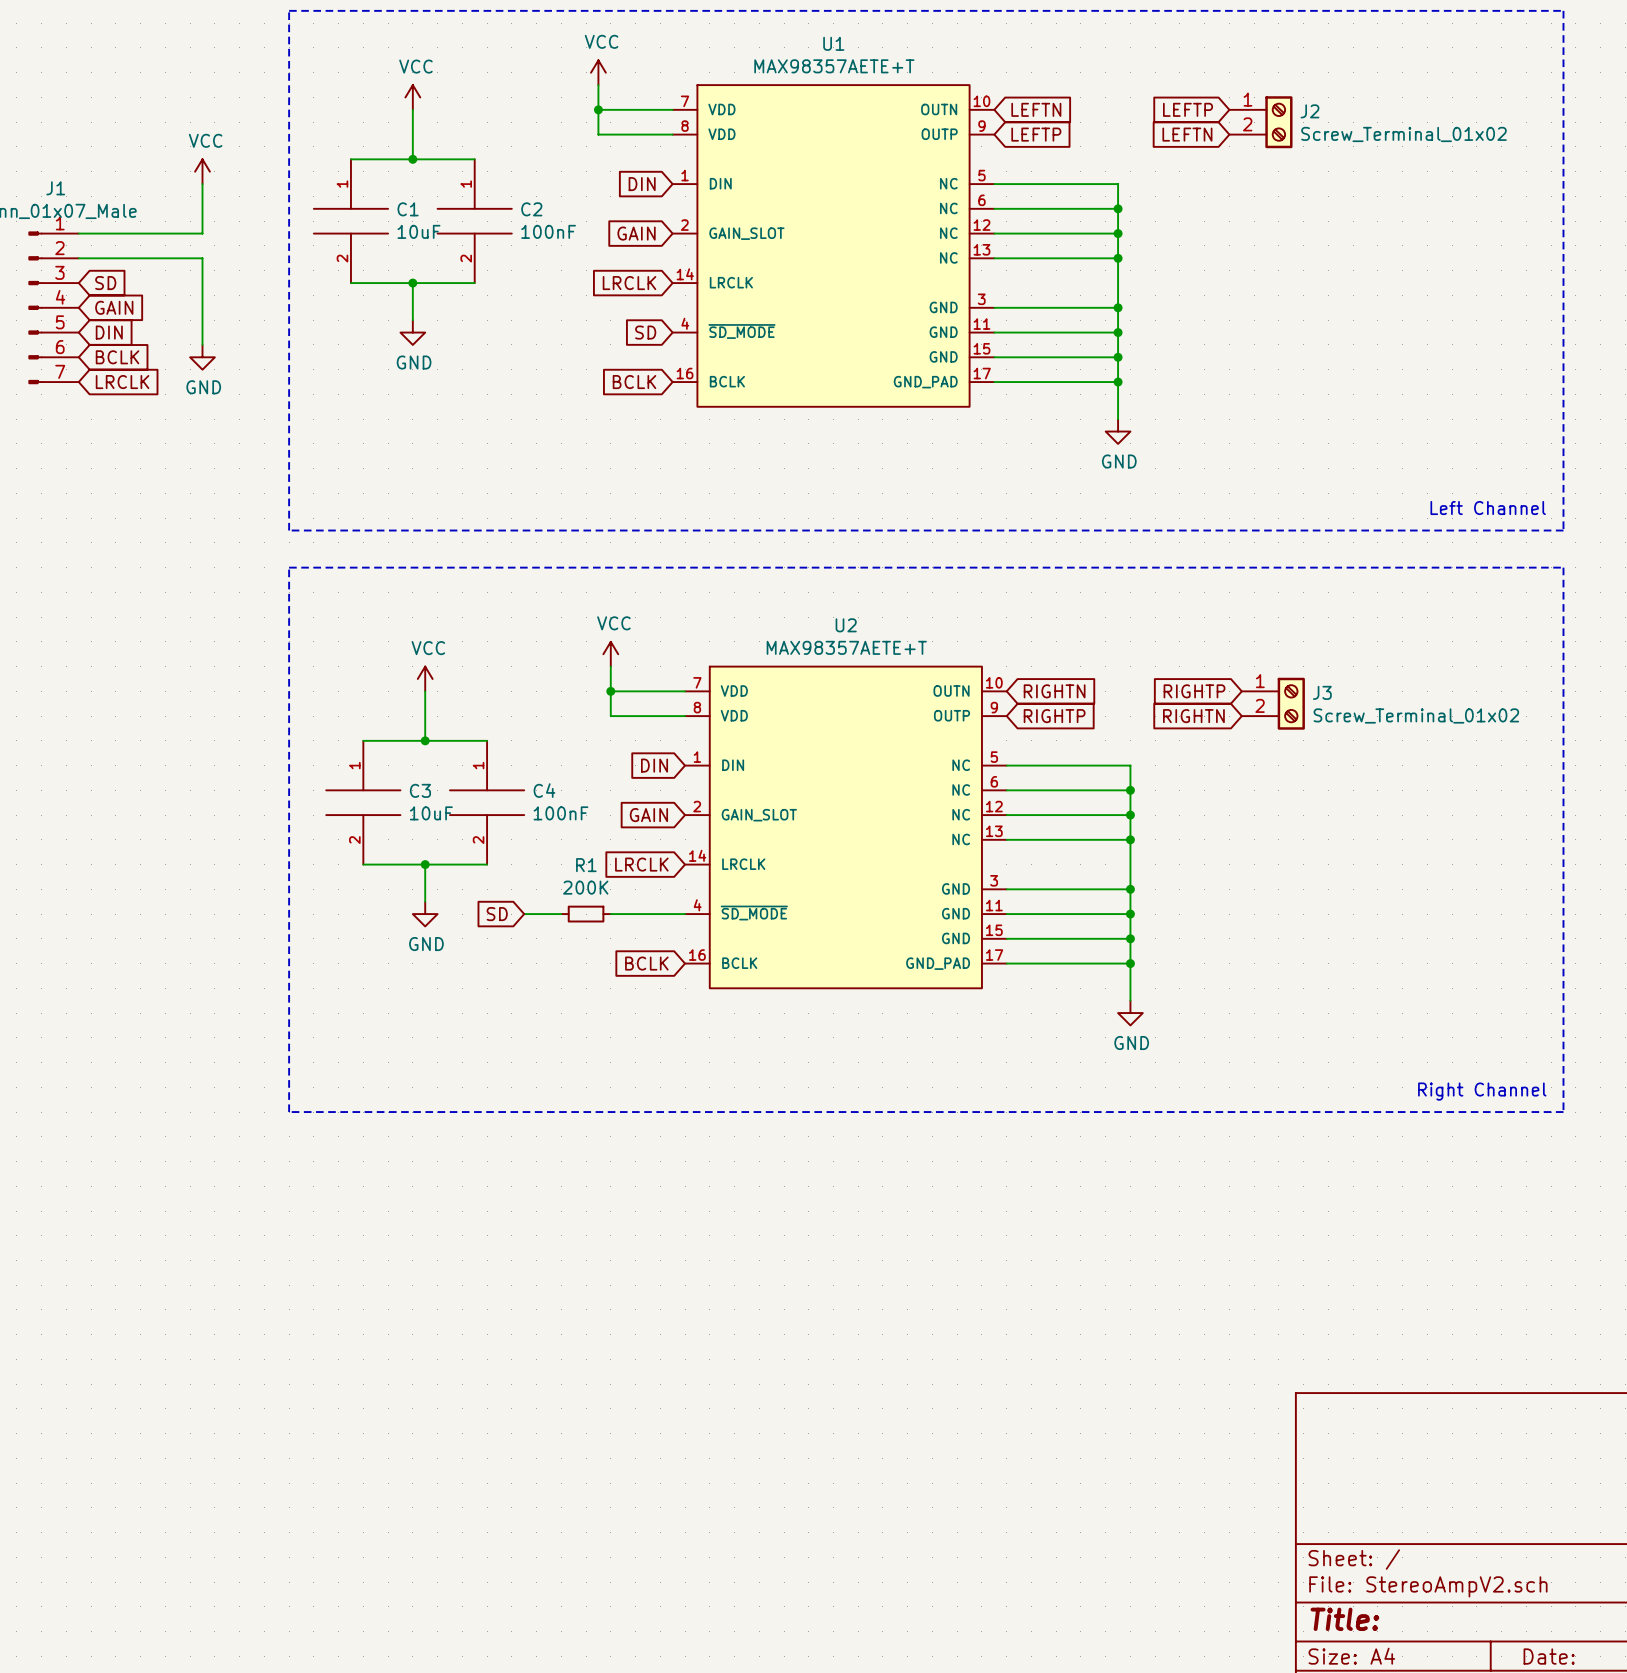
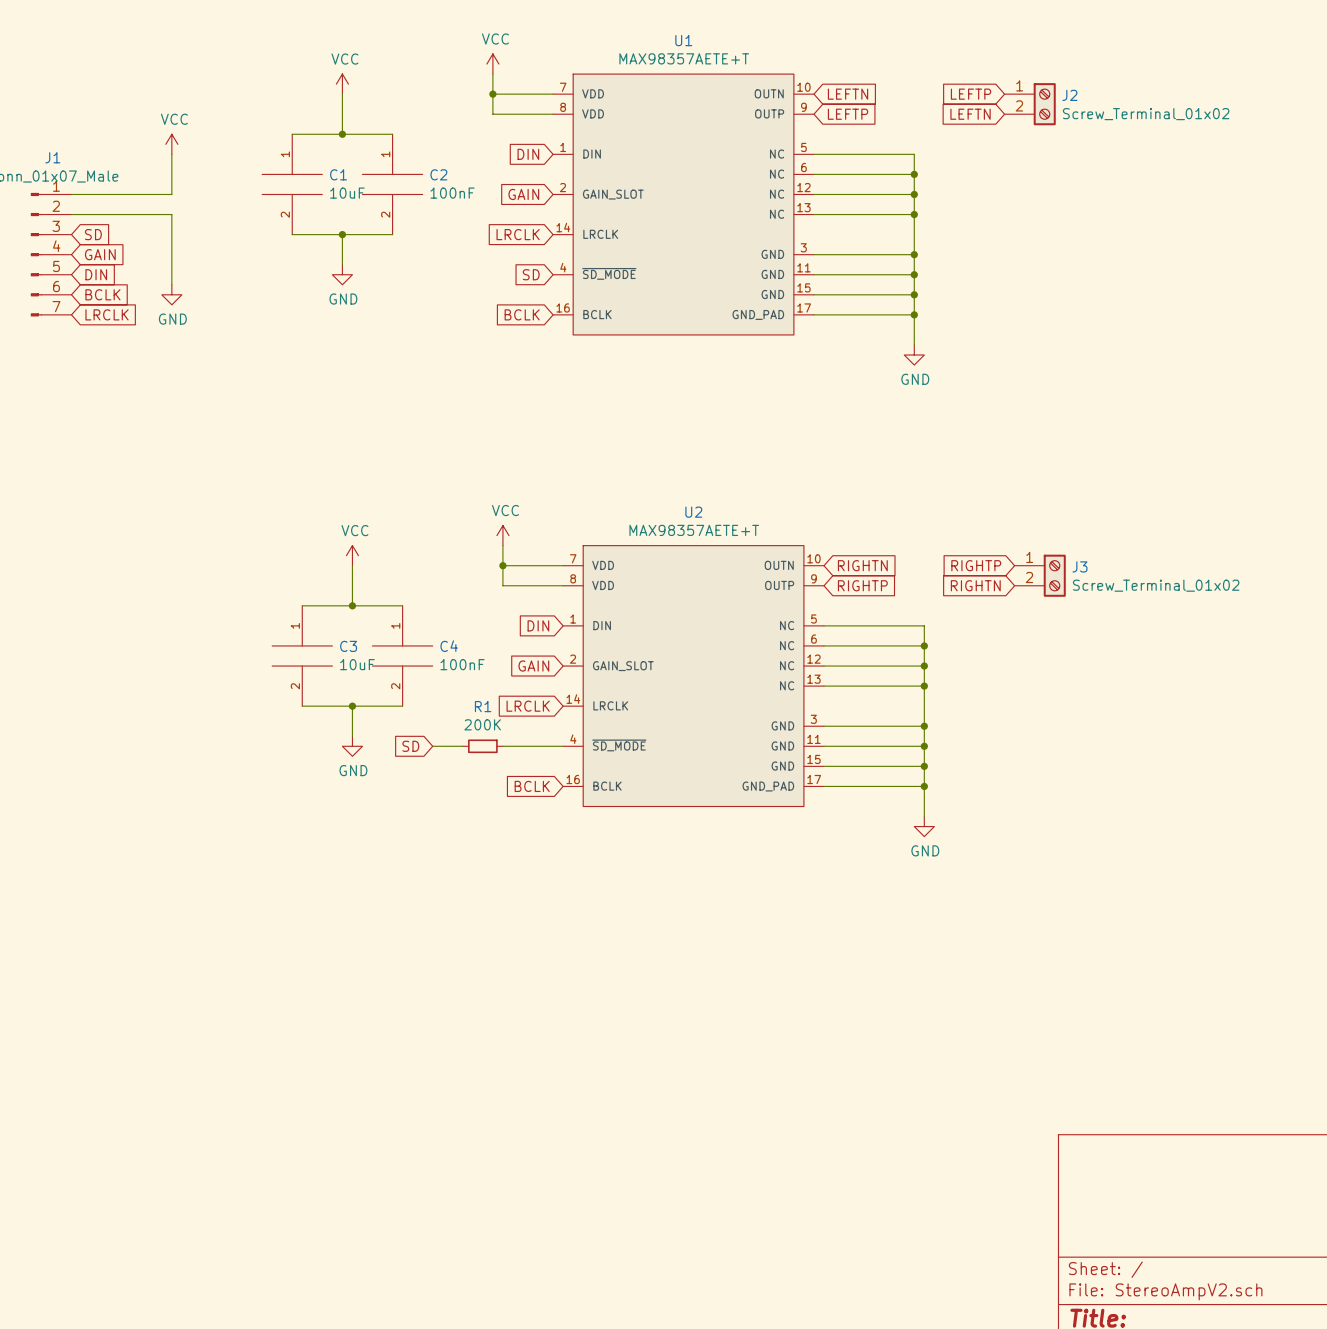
line: (289, 10) (289, 530) (1563, 530) (1563, 10) (289, 10) -> none
text: Left Channel (1488, 508) -> none
line: (289, 567) (289, 1112) (1563, 1112) (1563, 567) (289, 567) -> none
text: Right Channel (1482, 1091) -> none

